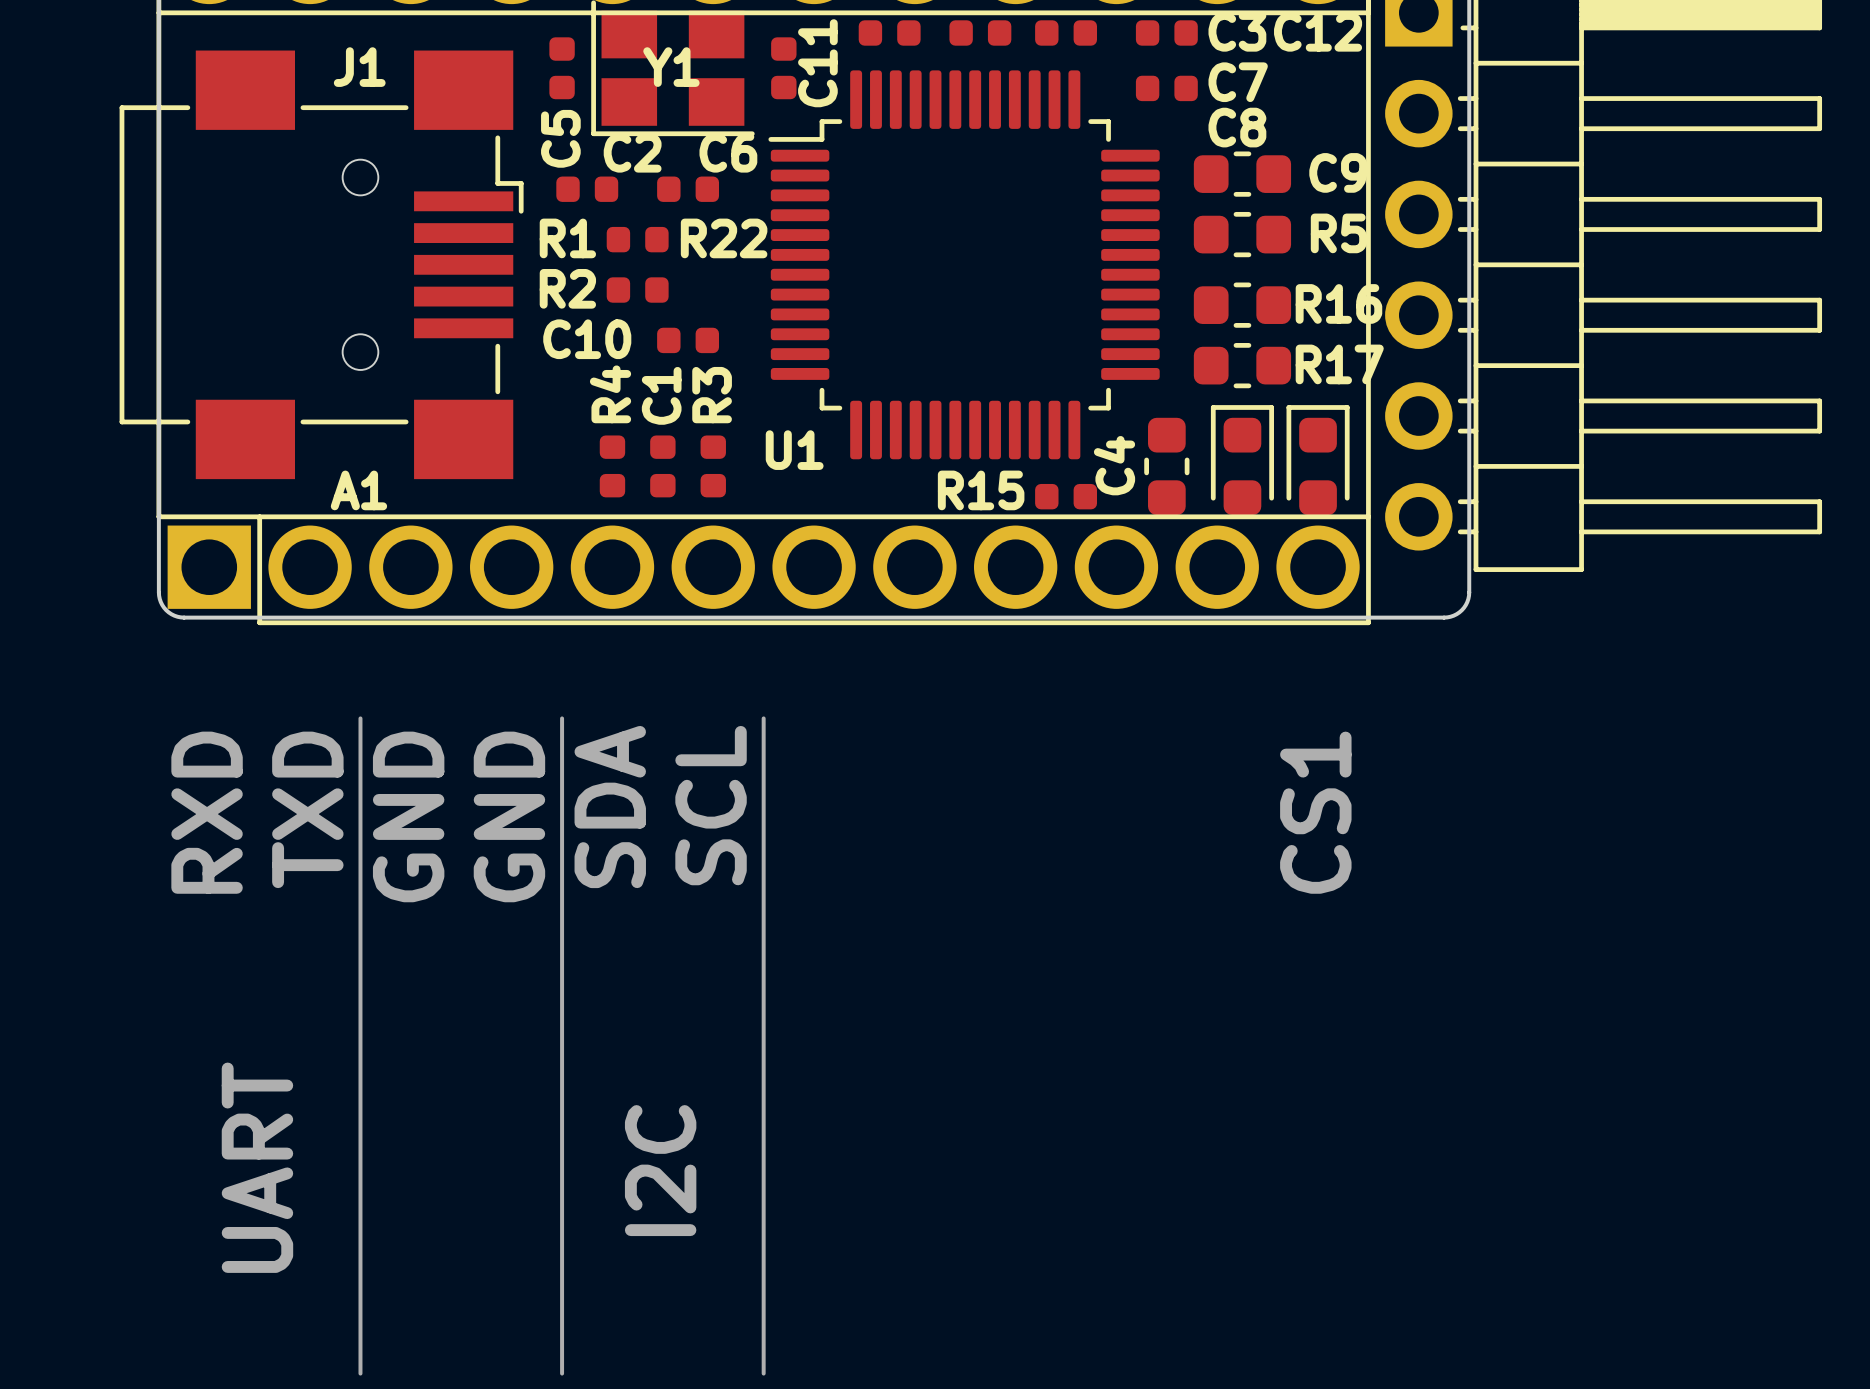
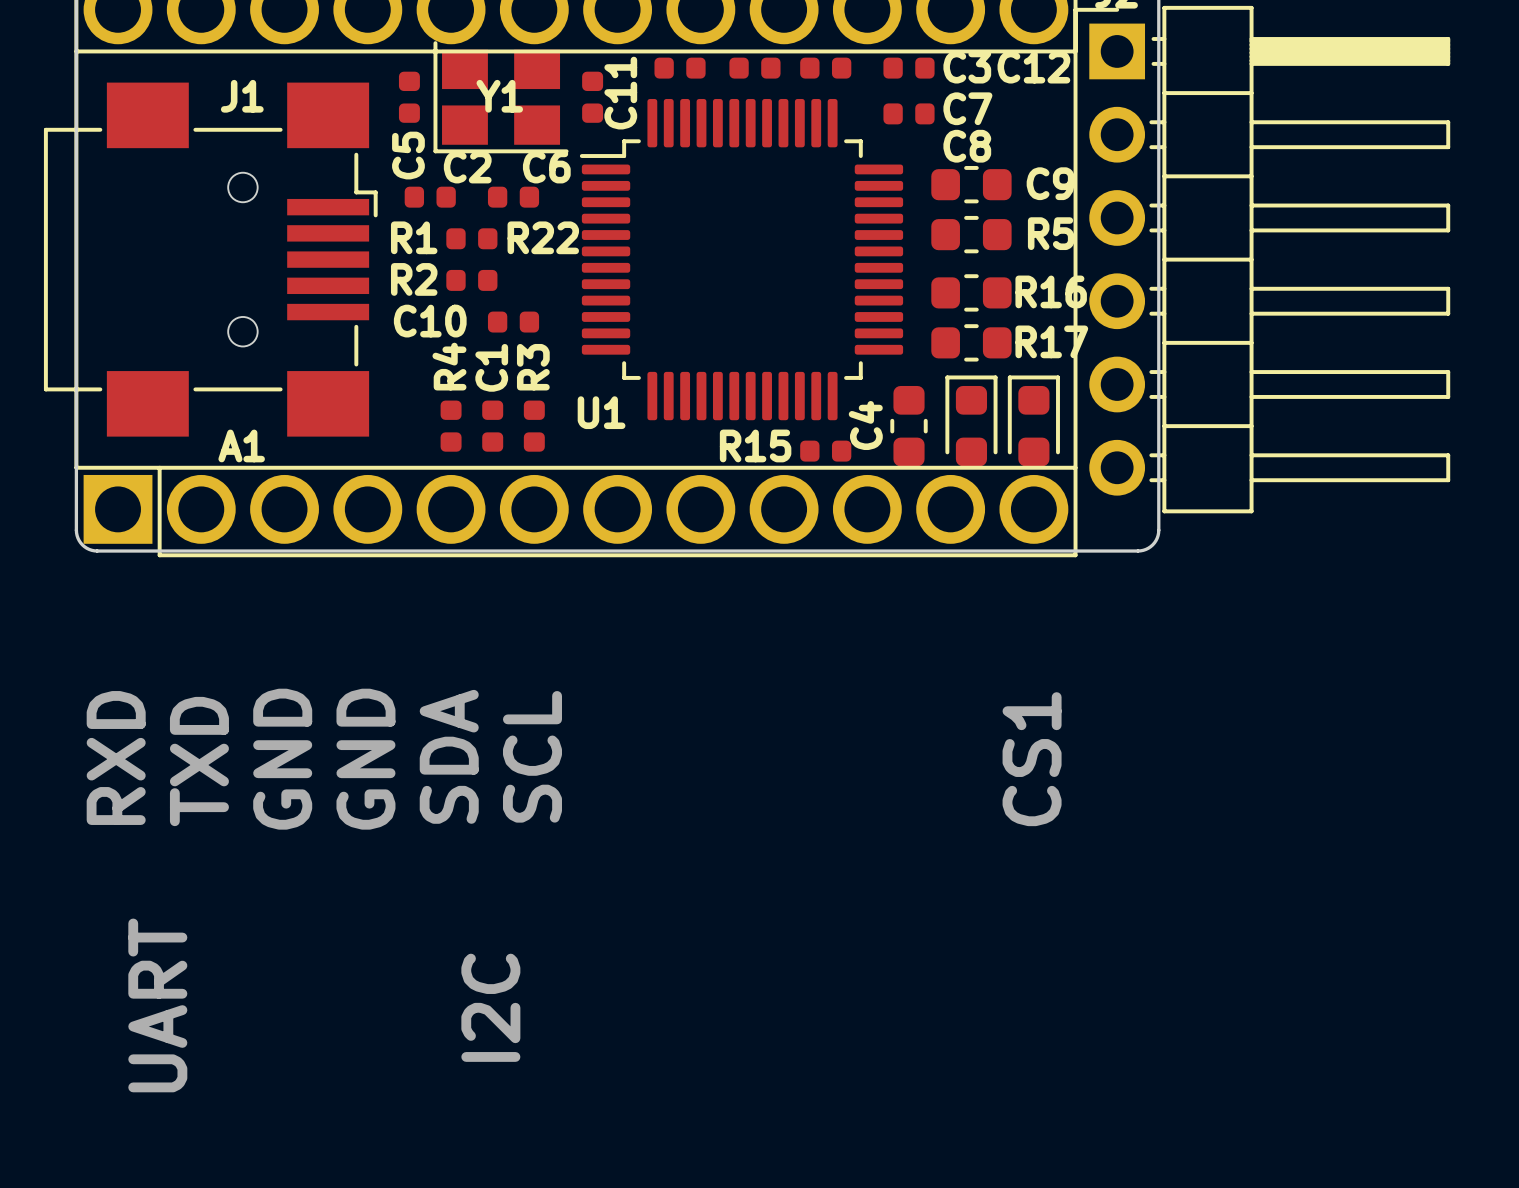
line: (360, 718) (360, 1373) -> none
line: (562, 718) (562, 1373) -> none
line: (763, 718) (763, 1373) -> none
text position: SCL (711, 805) -> SCL (532, 756)
text position: SDA (610, 807) -> SDA (449, 756)
text position: TXD (307, 809) -> TXD (199, 761)
text position: RXD (207, 812) -> RXD (116, 758)
text position: CS1 (1315, 812) -> CS1 (1032, 759)
text: GND (408, 816) -> none
text: GND (509, 816) -> none
text: none -> GND (282, 759)
text: none -> GND (365, 759)

